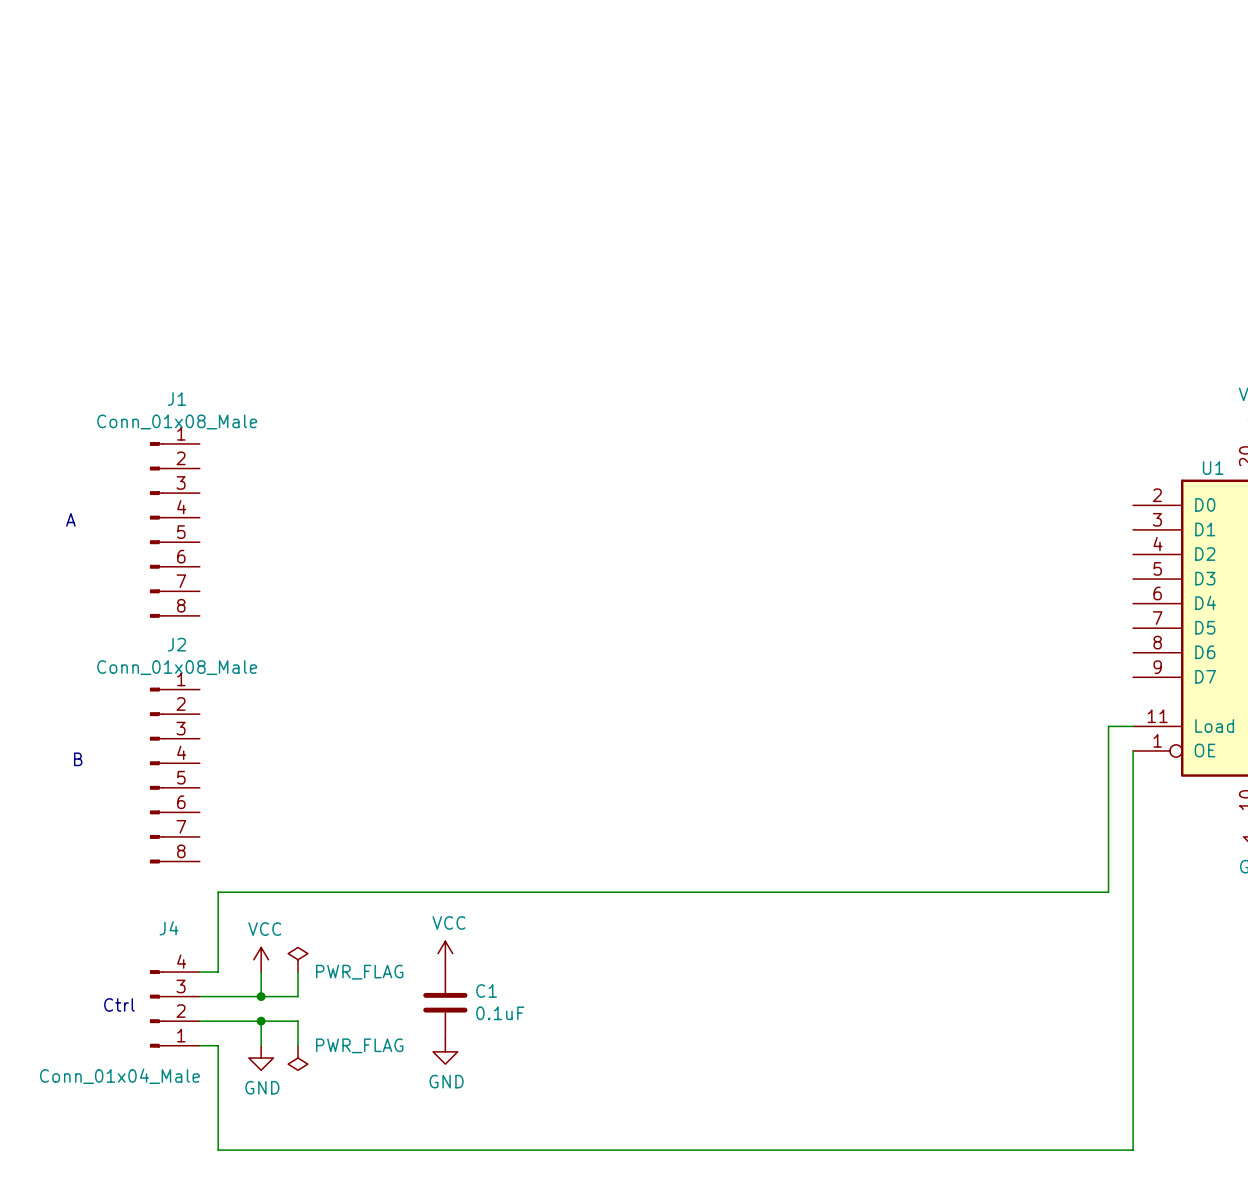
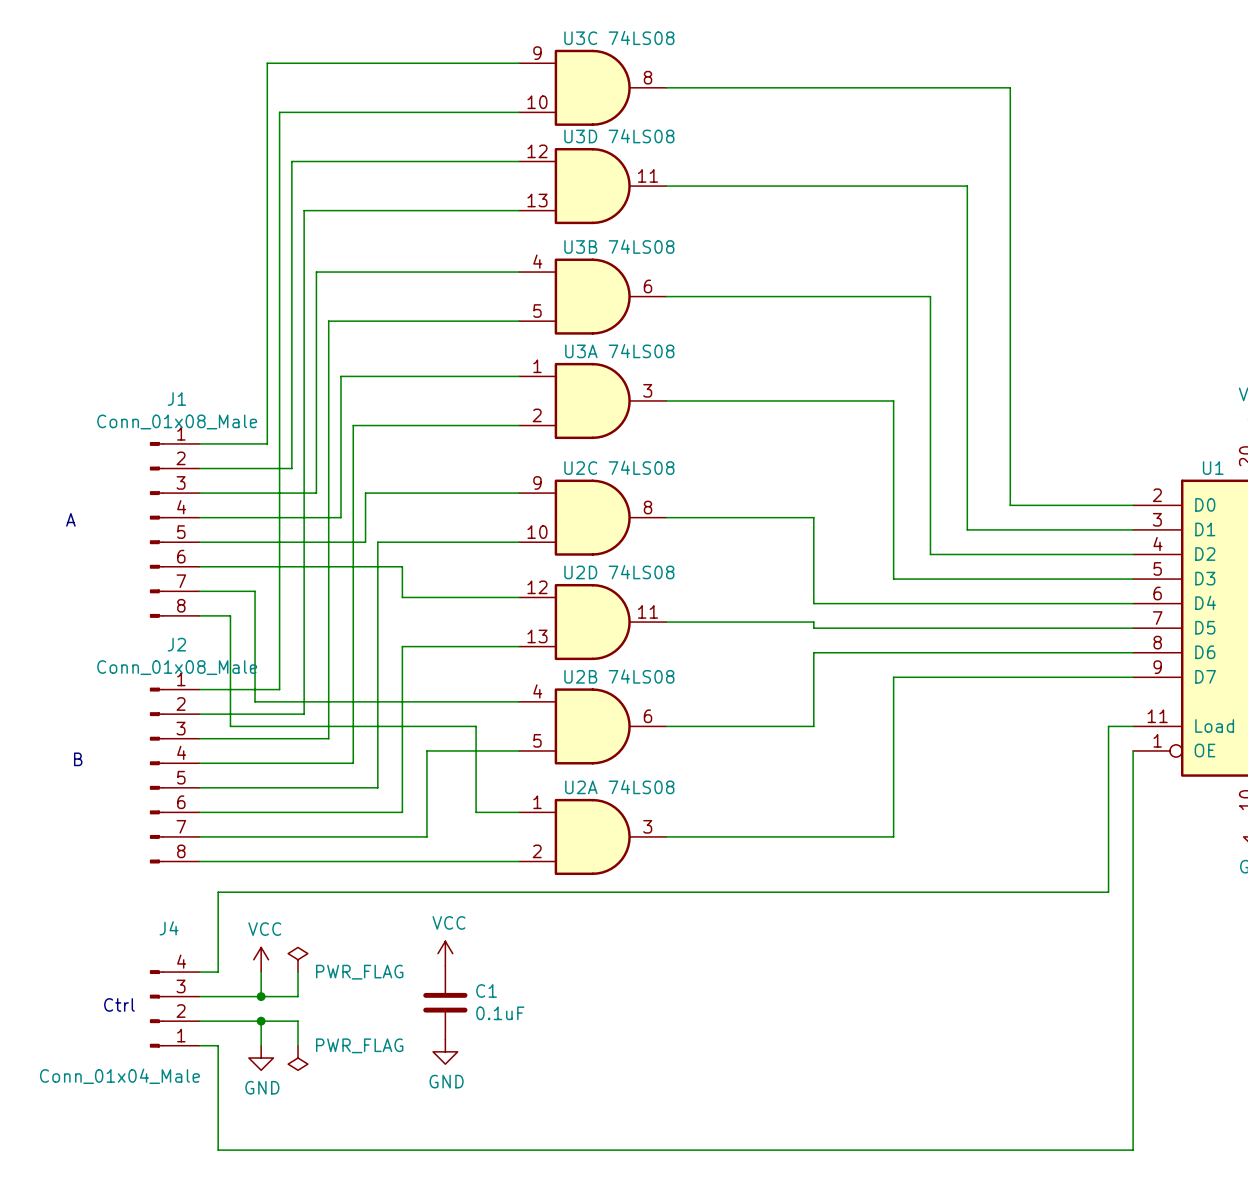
wire: none -> (519, 63) (267, 63) (267, 443) (199, 443)
U3C: none -> 74LS08 (592, 87)
wire: none -> (666, 87) (1010, 87) (1010, 505) (1133, 505)
wire: none -> (519, 112) (279, 112) (279, 689) (199, 689)
wire: none -> (519, 161) (291, 161) (291, 468) (199, 468)
U3D: none -> 74LS08 (592, 186)
wire: none -> (666, 186) (967, 186) (967, 529) (1133, 529)
wire: none -> (519, 210) (304, 210) (304, 714) (199, 714)
wire: none -> (519, 272) (316, 272) (316, 493) (199, 493)
U3B: none -> 74LS08 (592, 296)
wire: none -> (666, 296) (930, 296) (930, 554) (1133, 554)
wire: none -> (519, 321) (328, 321) (328, 738) (199, 738)
wire: none -> (519, 376) (340, 376) (340, 517) (199, 517)
U3A: none -> 74LS08 (592, 400)
wire: none -> (666, 400) (893, 400) (893, 579) (1133, 579)
wire: none -> (519, 425) (353, 425) (353, 763) (199, 763)
wire: none -> (519, 493) (365, 493) (365, 542) (199, 542)
U2C: none -> 74LS08 (592, 517)
wire: none -> (666, 517) (813, 517) (813, 603) (1133, 603)
wire: none -> (519, 542) (377, 542) (377, 787) (199, 787)
wire: none -> (199, 566) (402, 566) (402, 597) (519, 597)
wire: none -> (199, 591) (255, 591) (255, 701) (519, 701)
wire: none -> (199, 615) (230, 615) (230, 726) (476, 726) (476, 812) (519, 812)
U2D: none -> 74LS08 (592, 622)
wire: none -> (666, 622) (813, 622) (813, 628) (1133, 628)
wire: none -> (519, 646) (402, 646) (402, 812) (199, 812)
wire: none -> (1133, 652) (813, 652) (813, 726) (666, 726)
wire: none -> (1133, 677) (893, 677) (893, 836) (666, 836)
U2B: none -> 74LS08 (592, 726)
wire: none -> (519, 750) (426, 750) (426, 836) (199, 836)
U2A: none -> 74LS08 (592, 836)
wire: none -> (199, 861) (519, 861)

